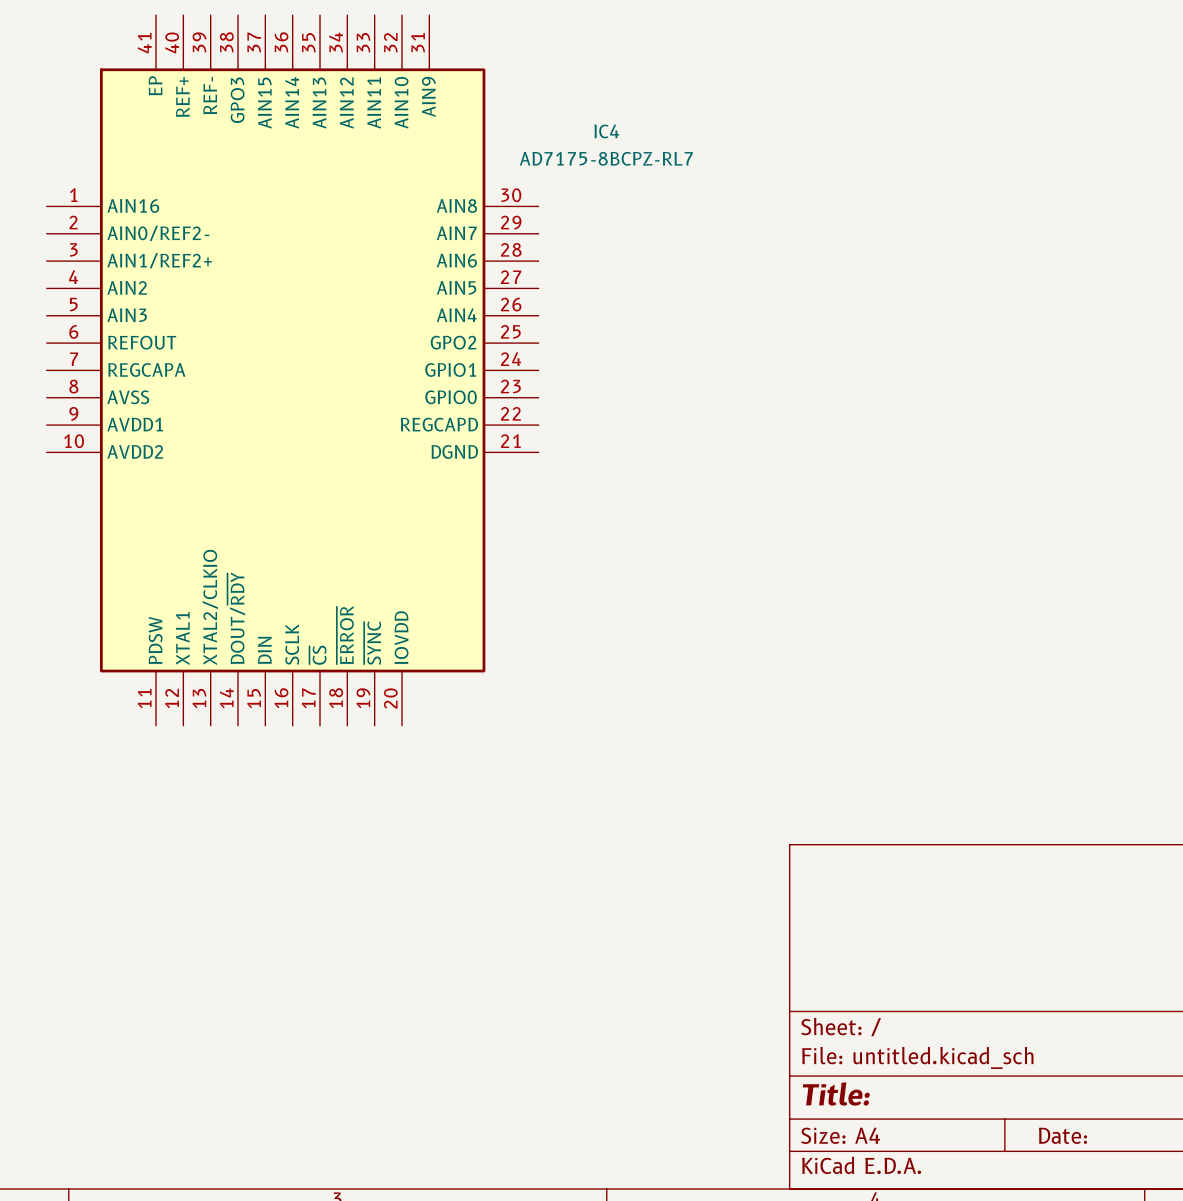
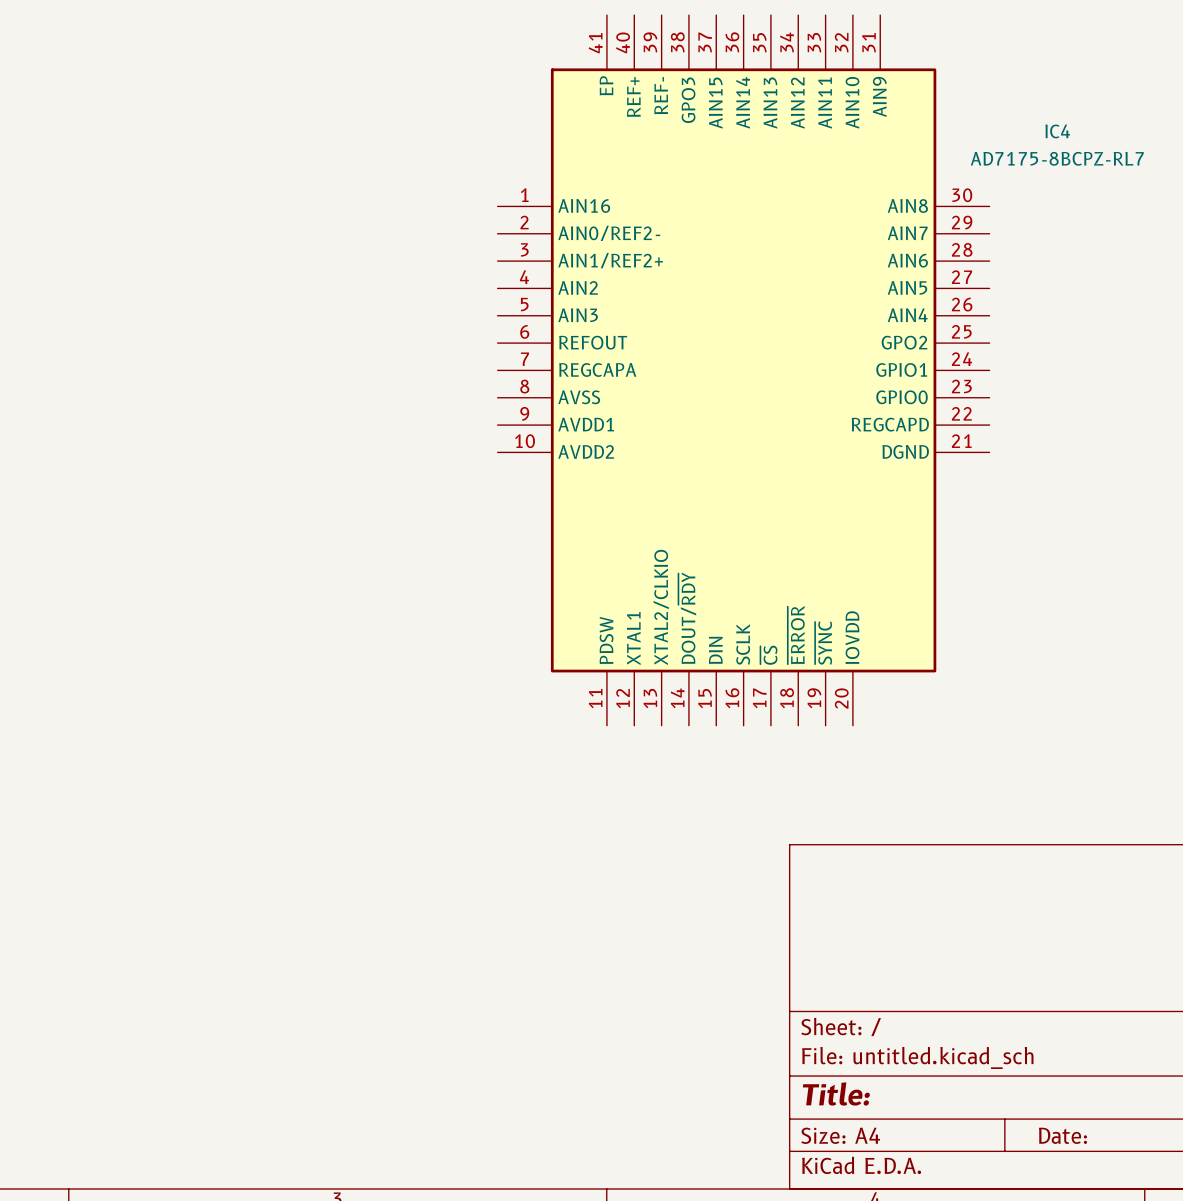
IC4 position: (292, 370) -> (743, 370)

